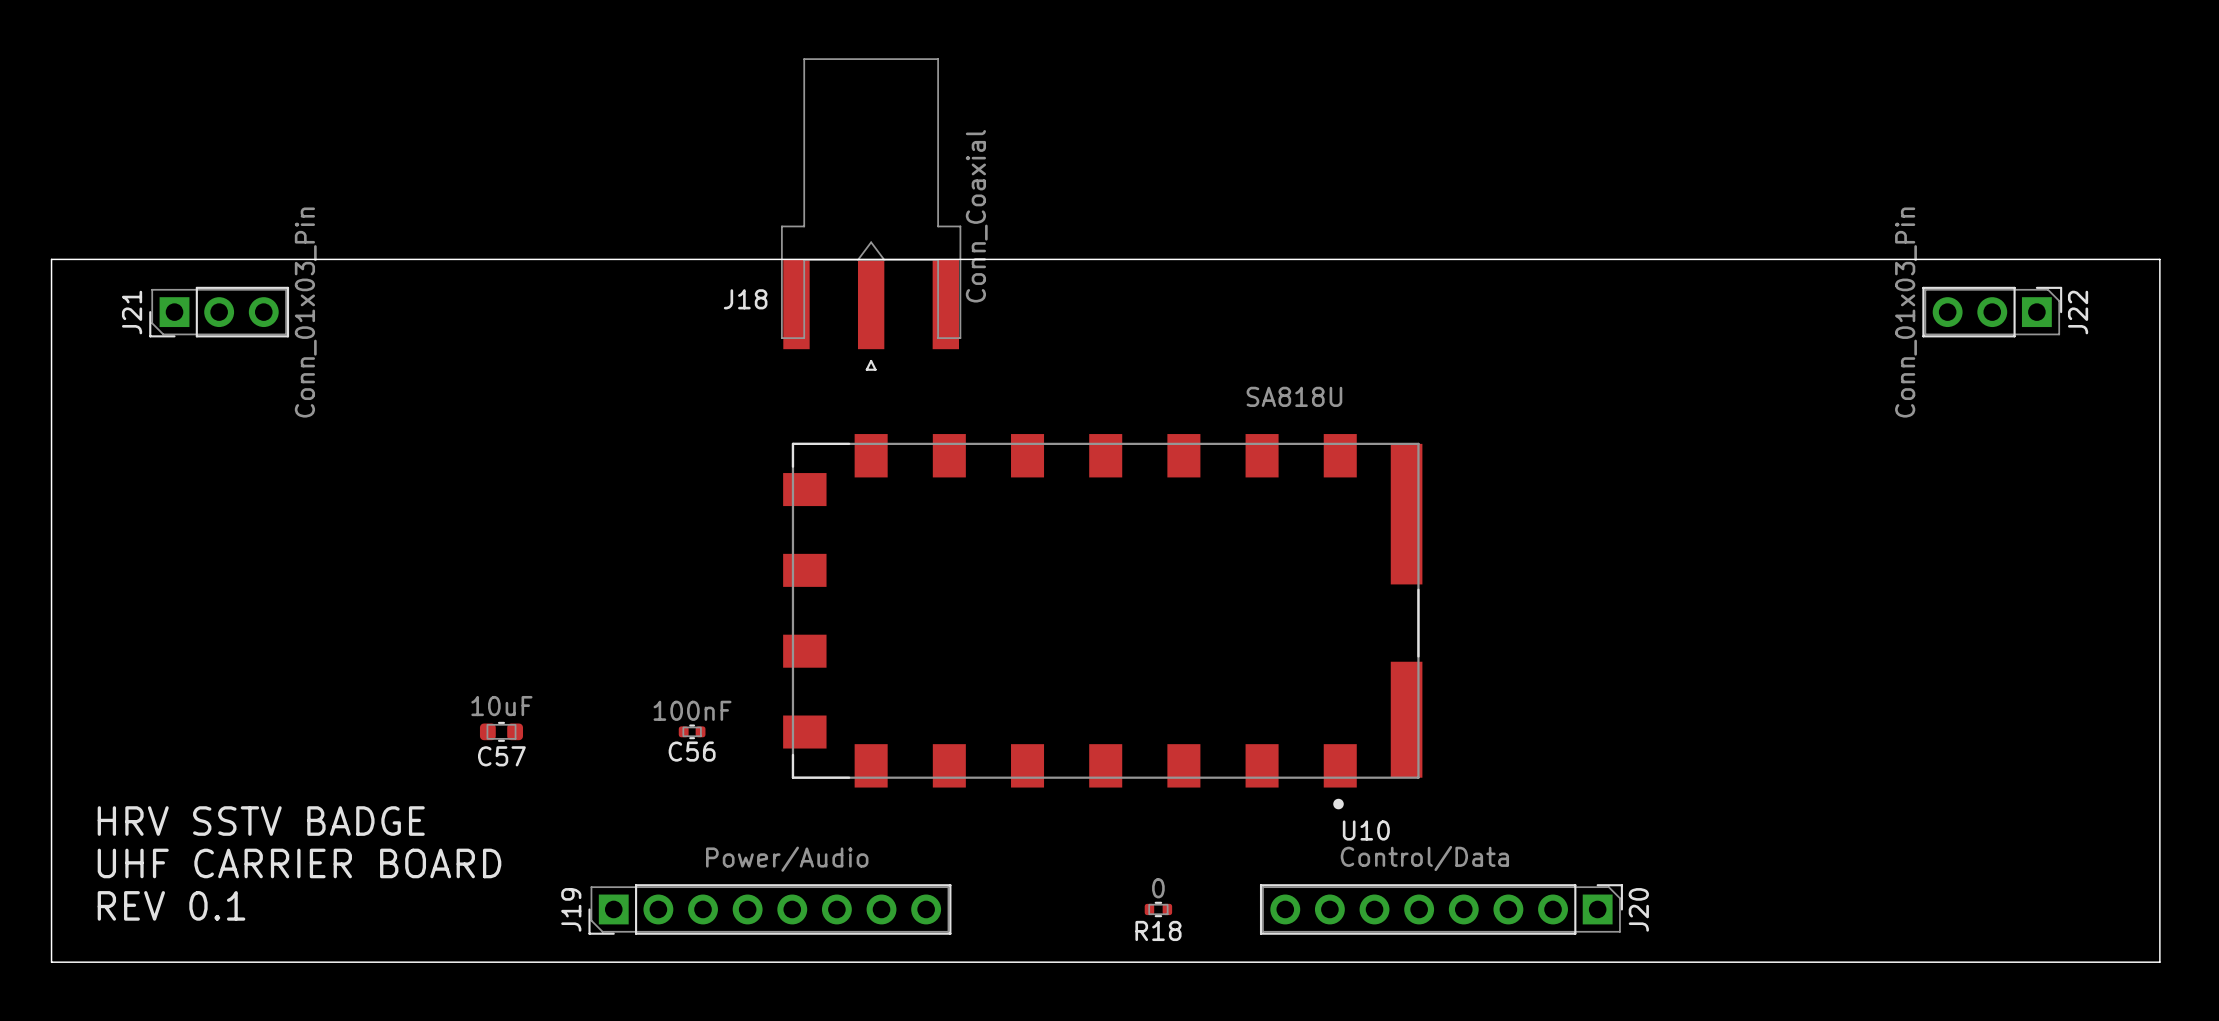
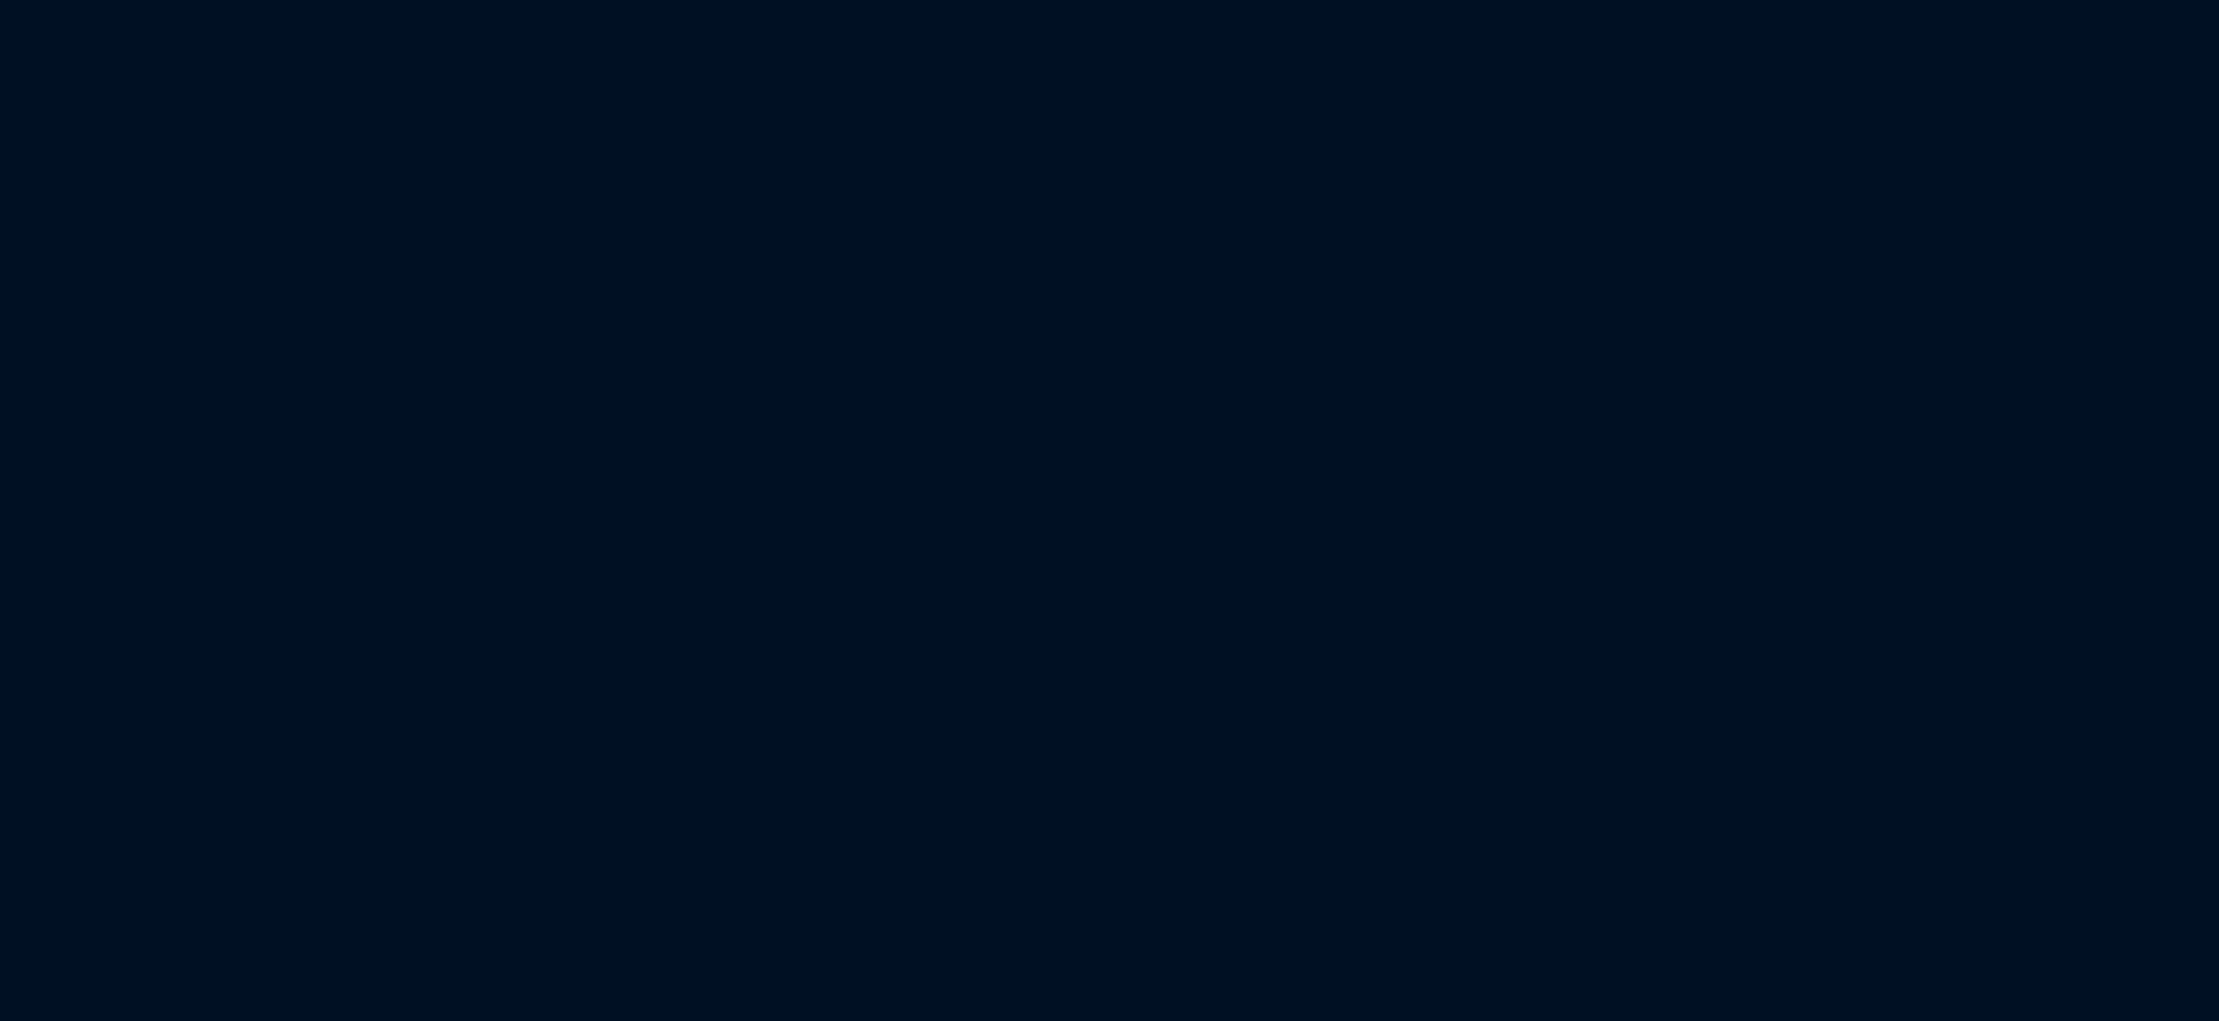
J18: Conn_Coaxial (871, 214) -> none
board edge: (51, 259) (2159, 259) (2159, 962) (51, 962) (51, 259) -> none
J21: Conn_01x03_Pin (219, 312) -> none
J22: Conn_01x03_Pin (1992, 312) -> none
U10: SA818U (1102, 621) -> none
C57: 10uF (501, 731) -> none
C56: 100nF (692, 731) -> none
text: HRV SSTV BADGE (261, 821) -> none
text: UHF CARRIER BOARD (299, 863) -> none
text: REV 0.1 (171, 905) -> none
J19: Power/Audio (769, 909) -> none
R18: 0 (1158, 909) -> none
J20: Control/Data (1441, 909) -> none

